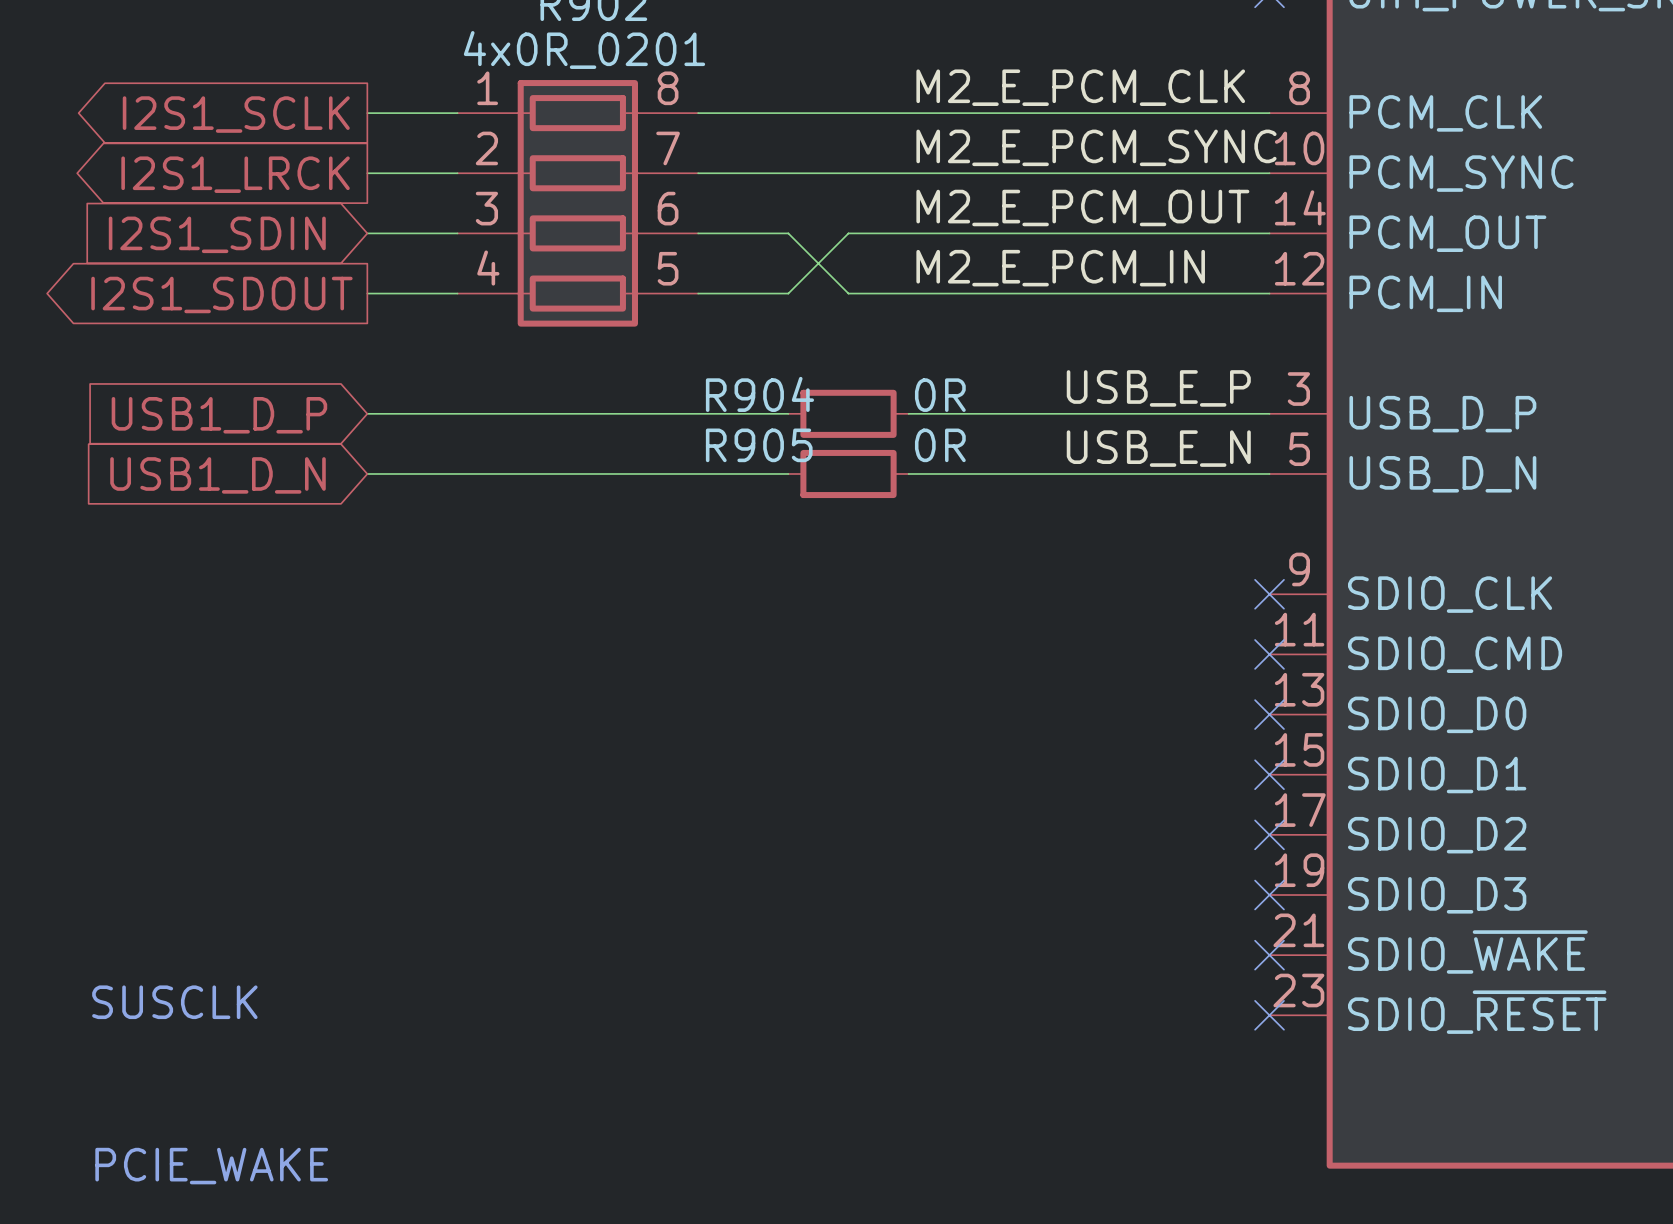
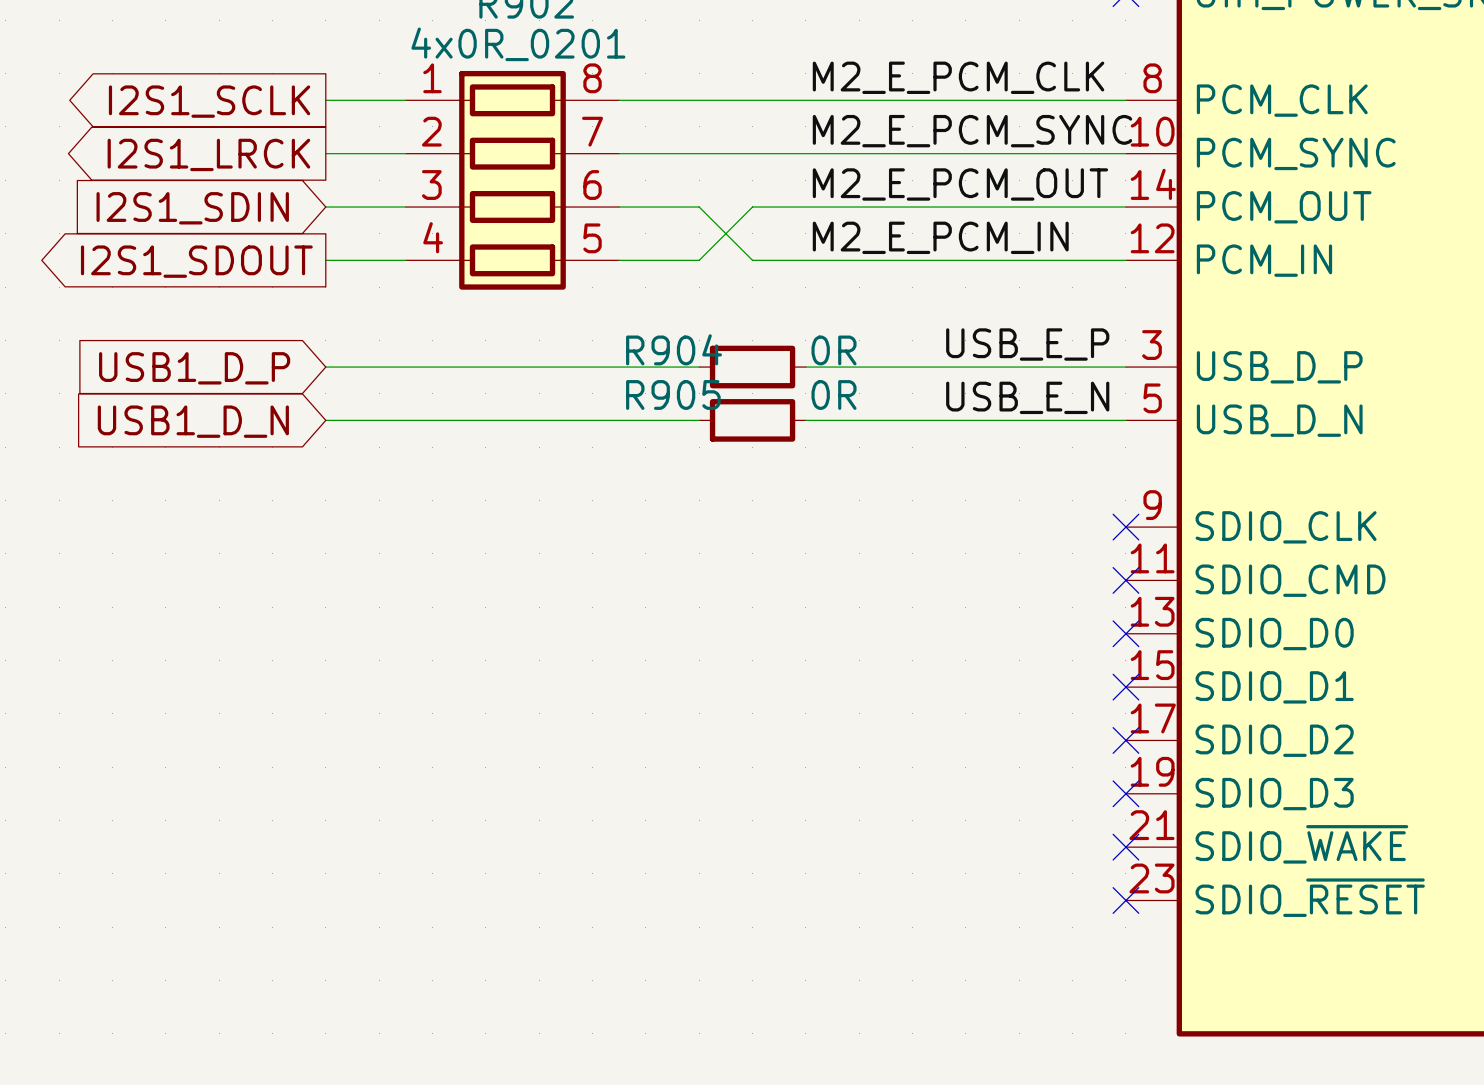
text: SUSCLK (174, 1002) -> none
text: PCIE_WAKE (211, 1166) -> none

